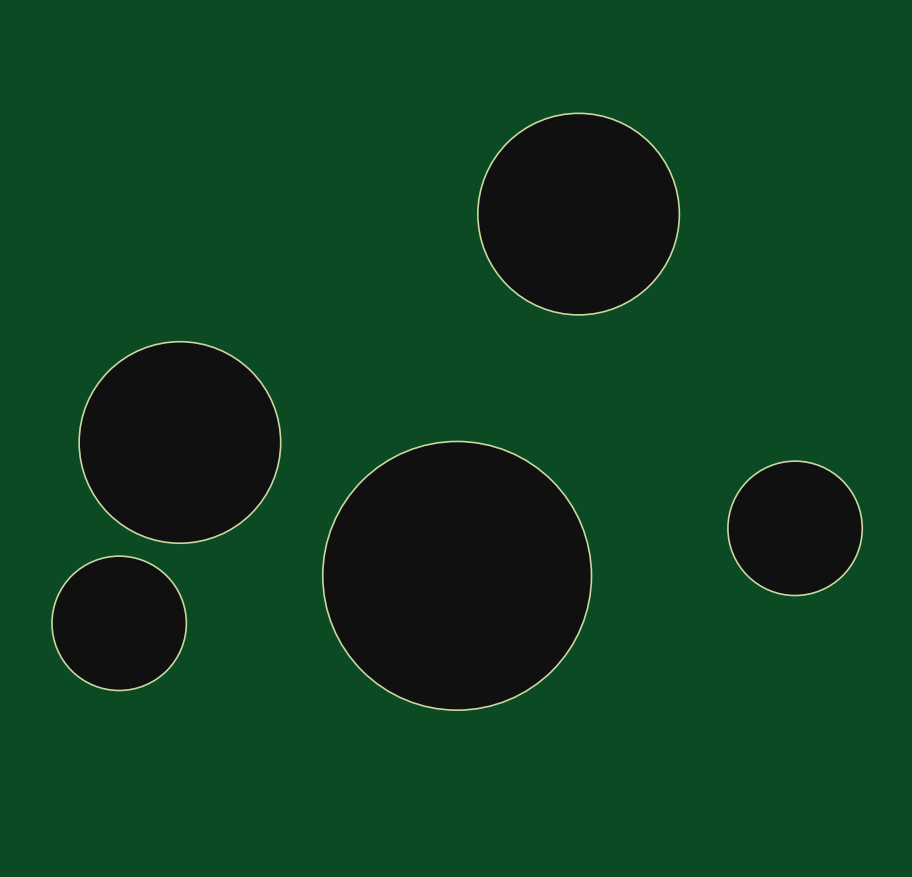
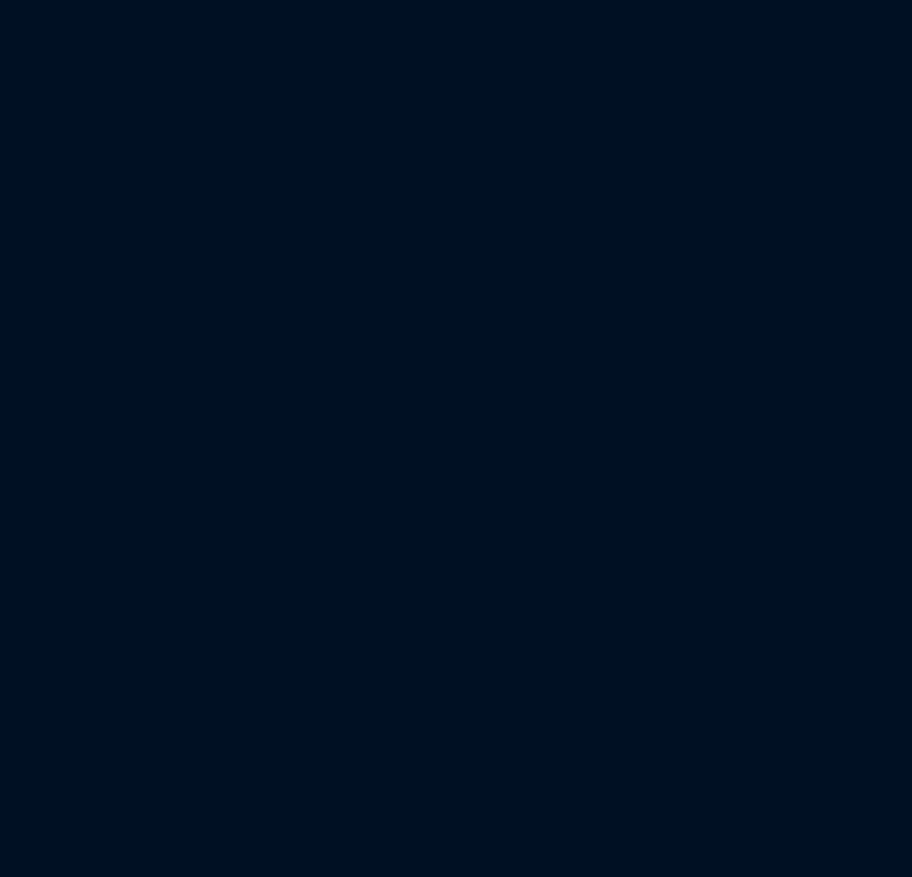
part: (457, 411) -> none

